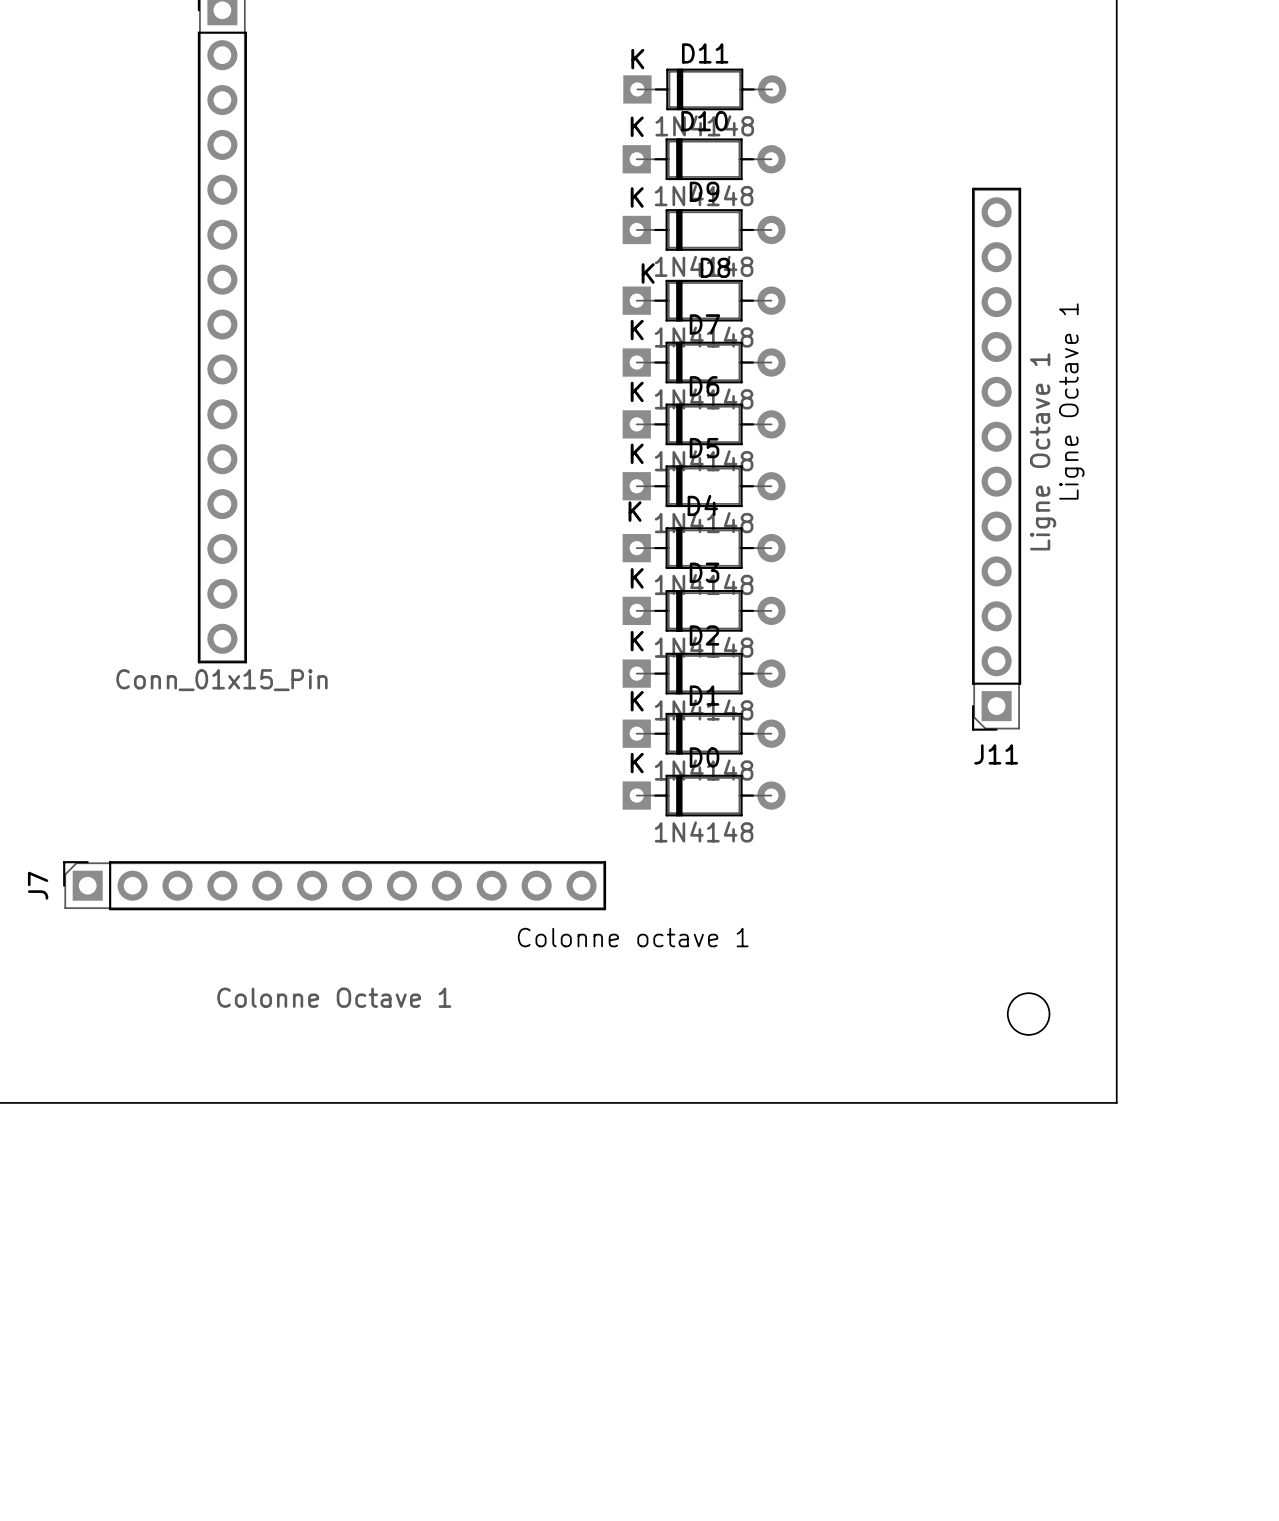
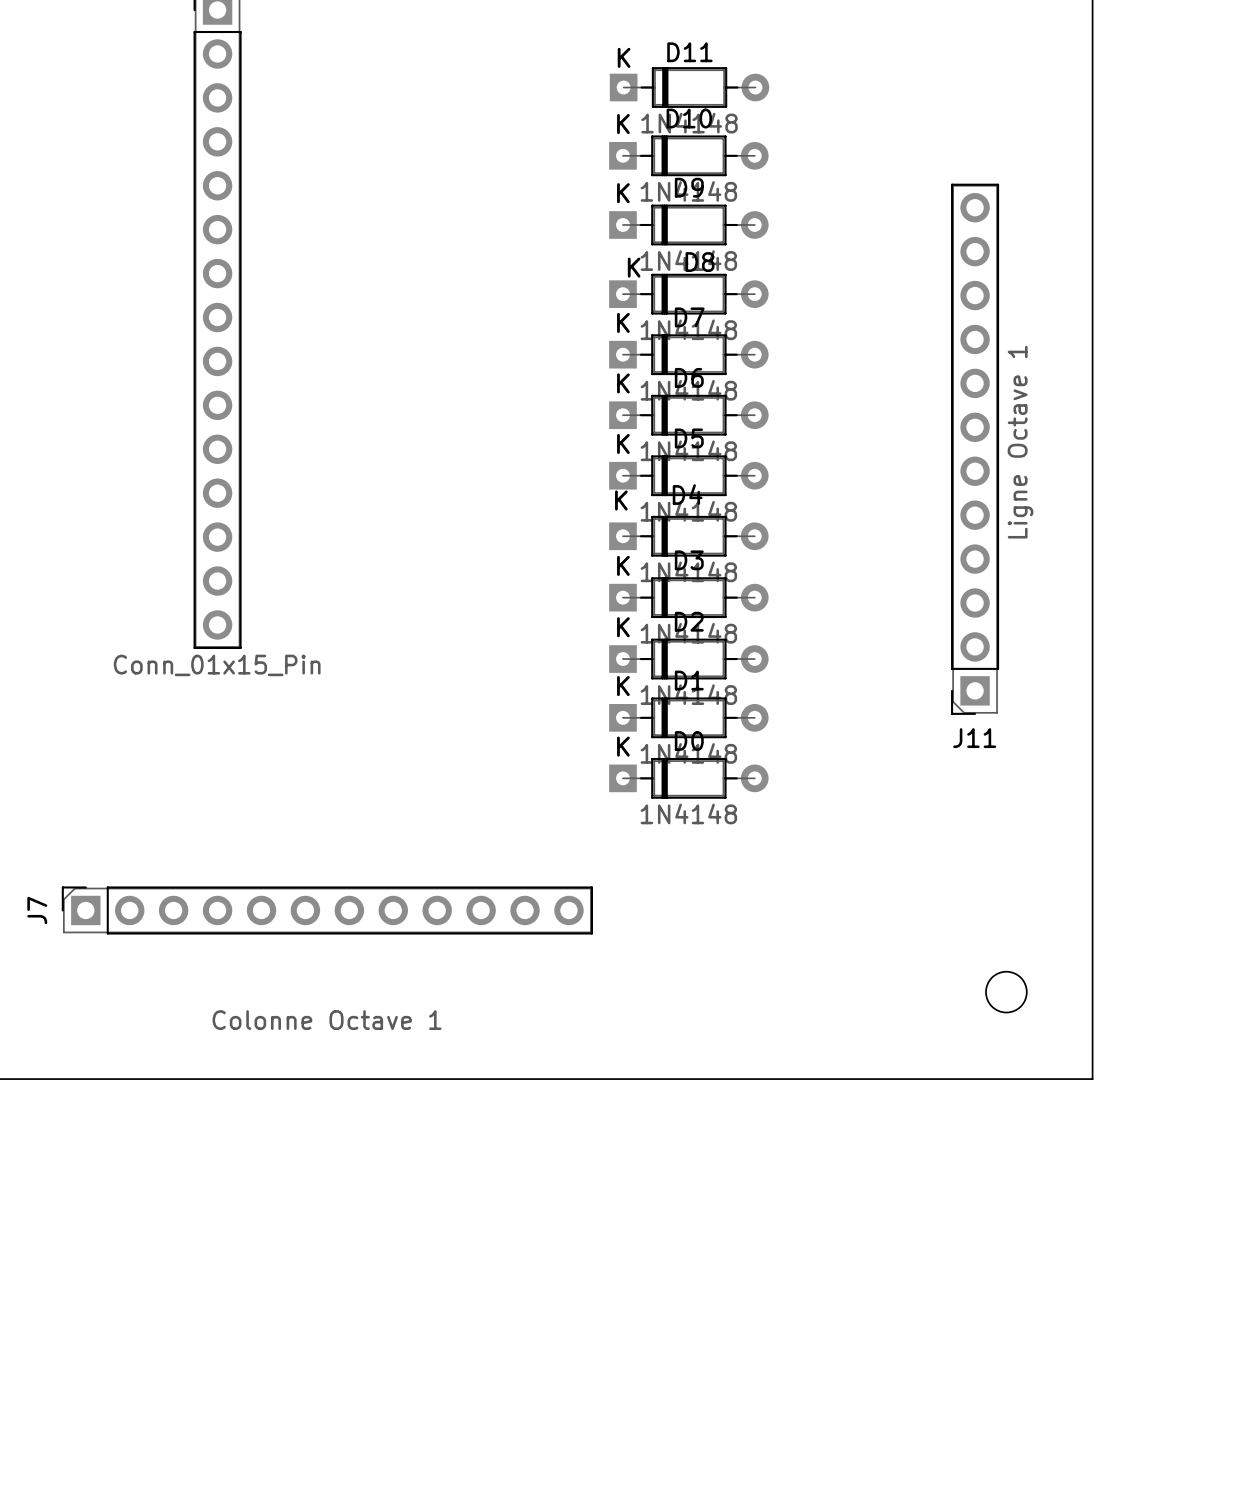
text: Ligne Octave 1 (1071, 401) -> none
J7 position: (334, 885) -> (327, 910)
text: Colonne octave 1 (633, 937) -> none

